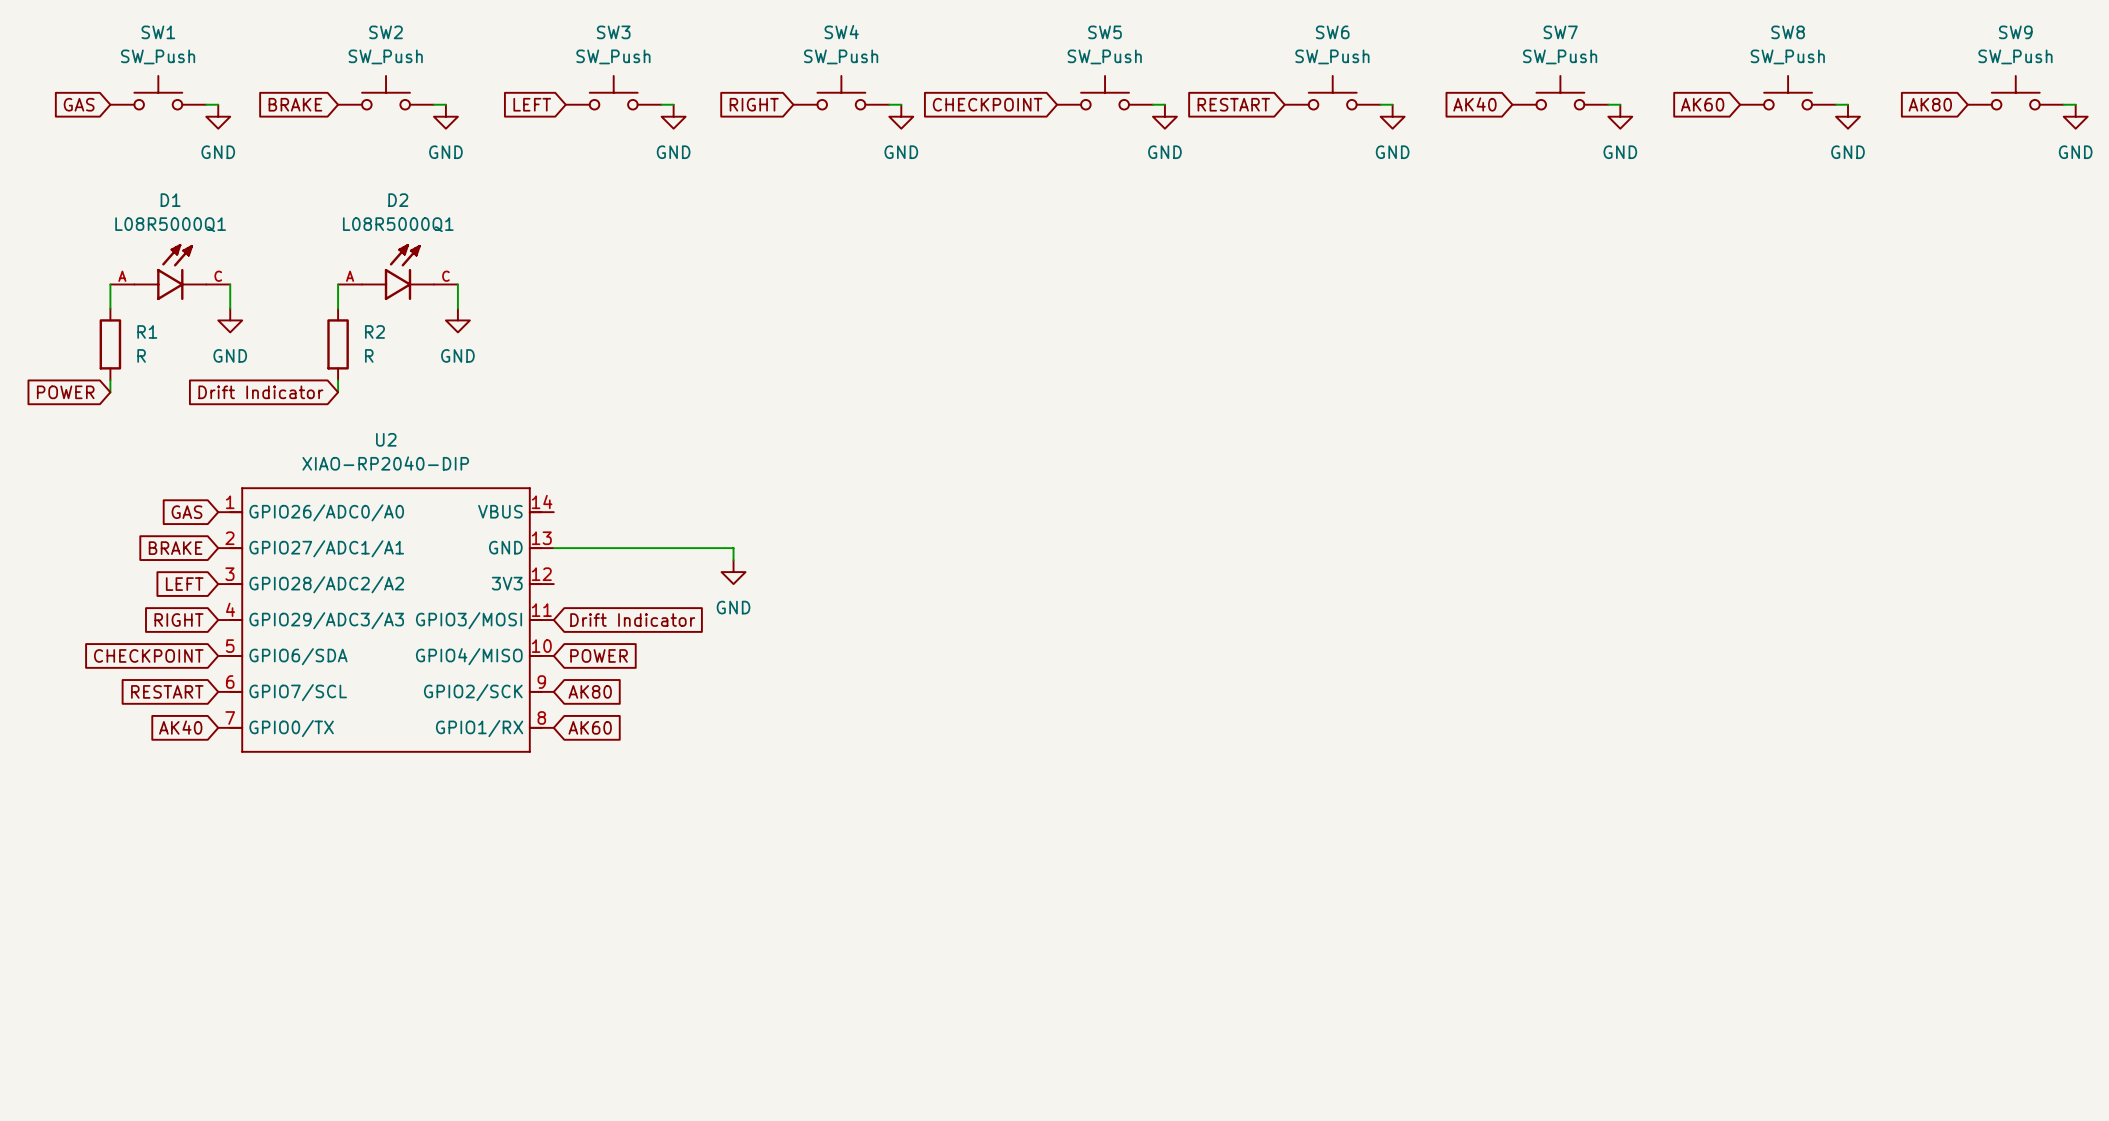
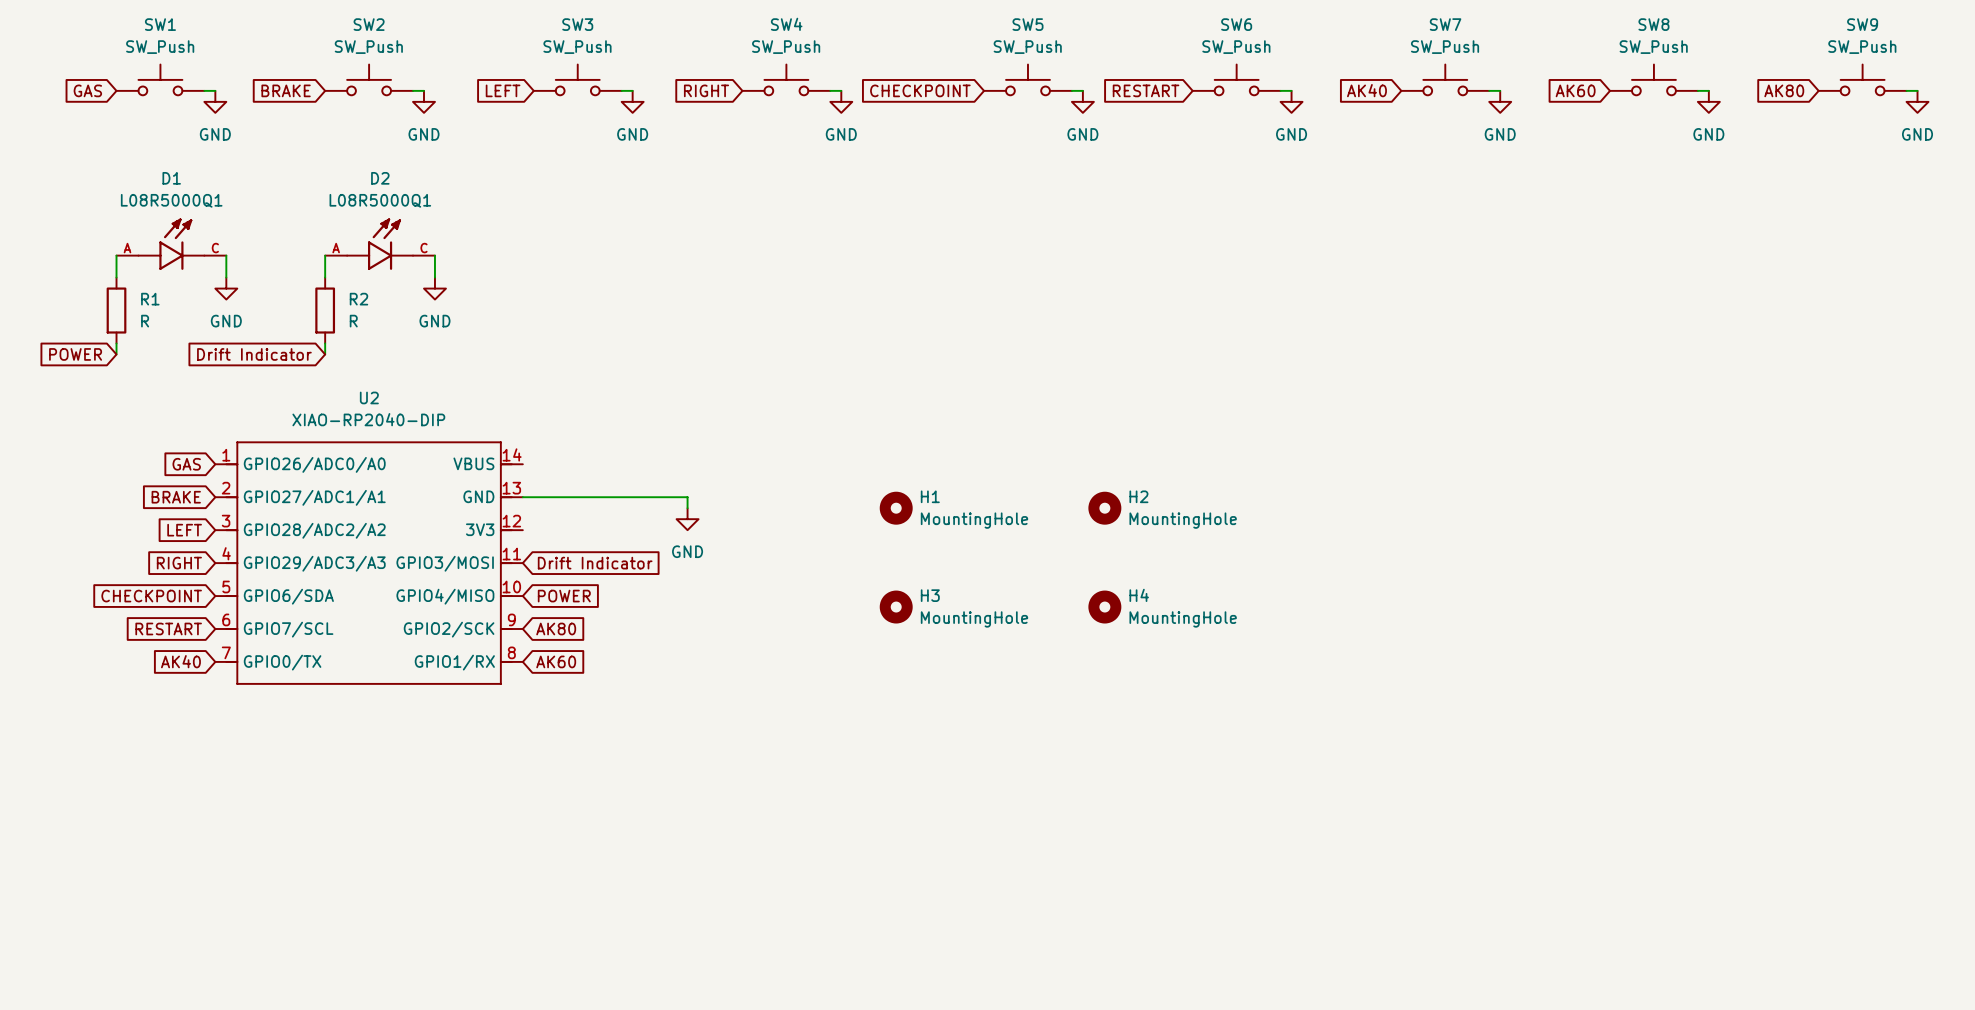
H1: none -> MountingHole (896, 508)
H2: none -> MountingHole (1104, 508)
H3: none -> MountingHole (896, 607)
H4: none -> MountingHole (1104, 607)

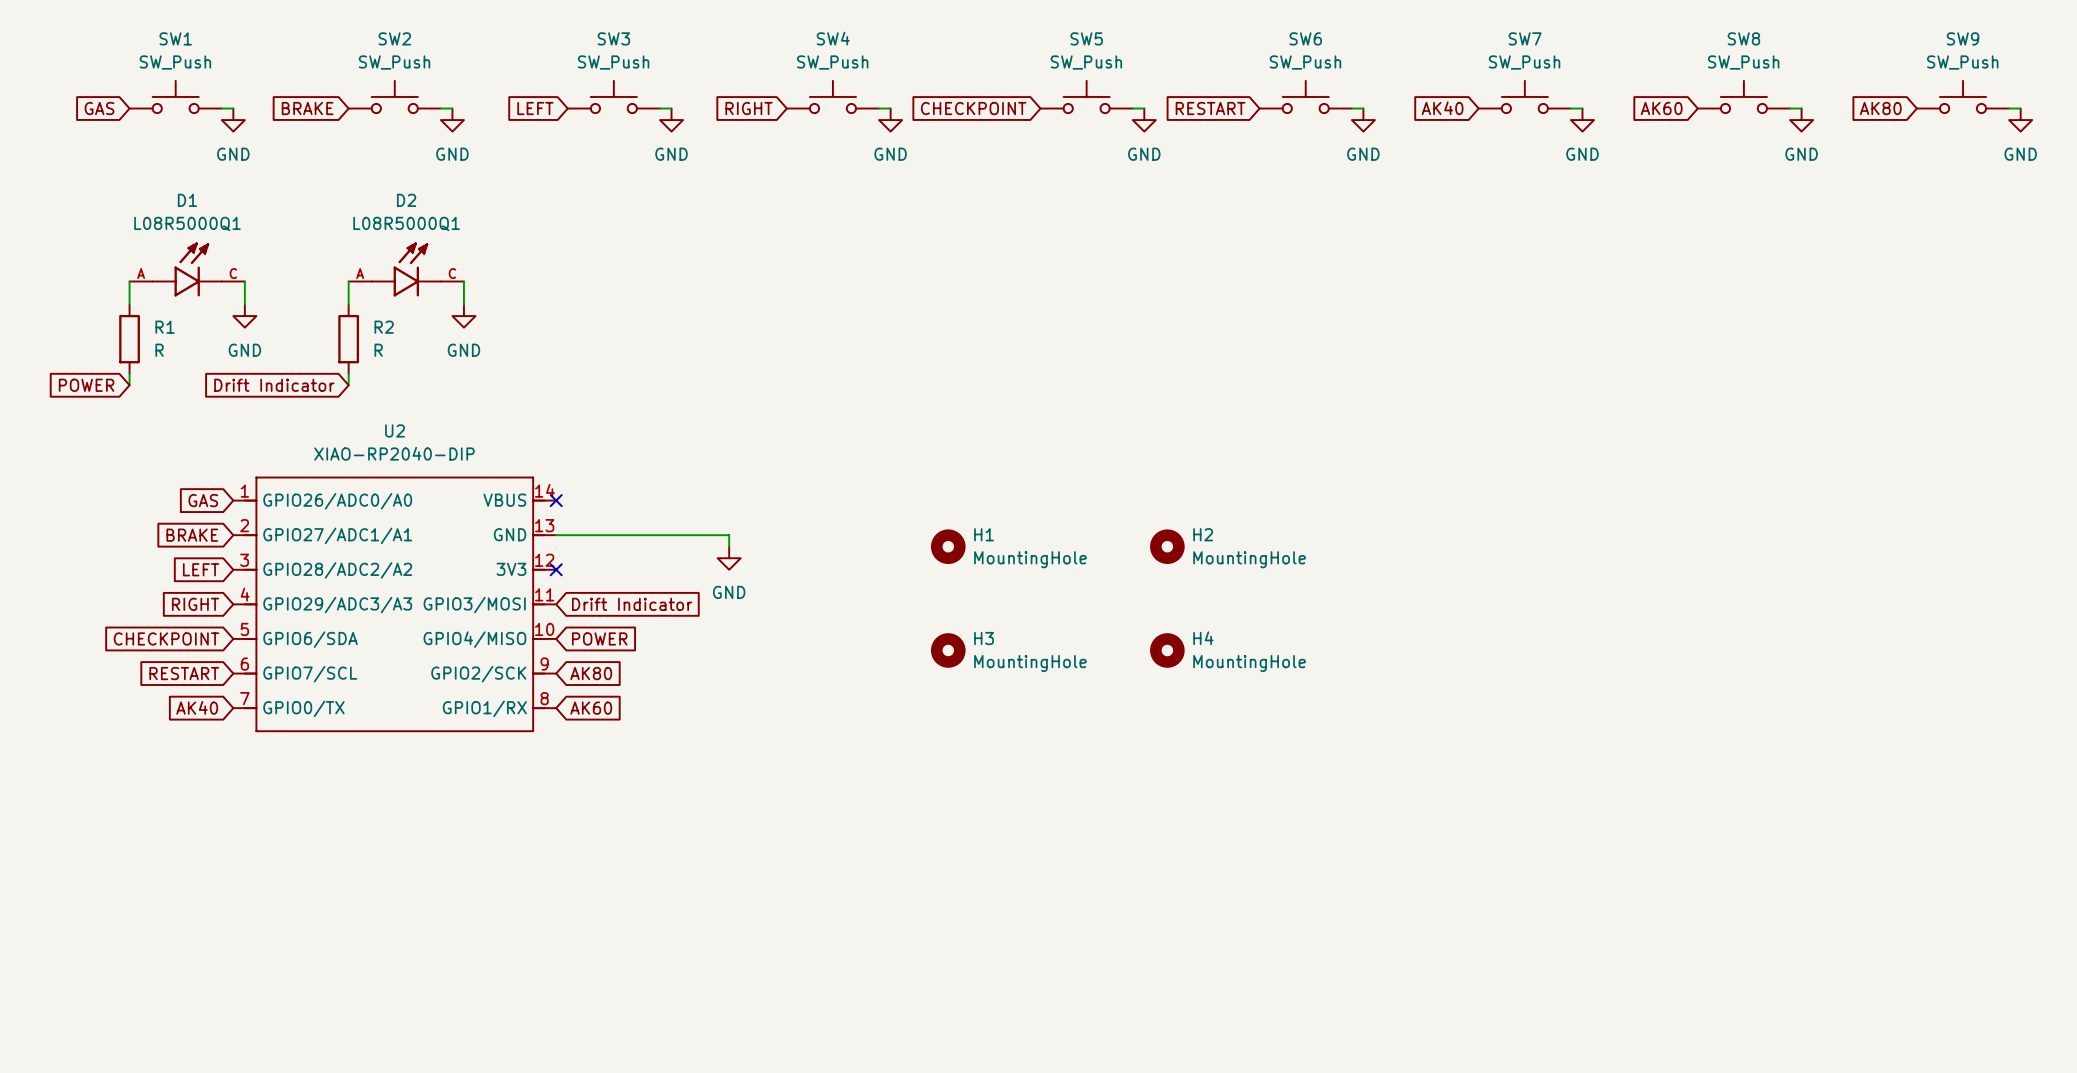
no-connect mark: none -> (556, 500)
no-connect mark: none -> (556, 569)

